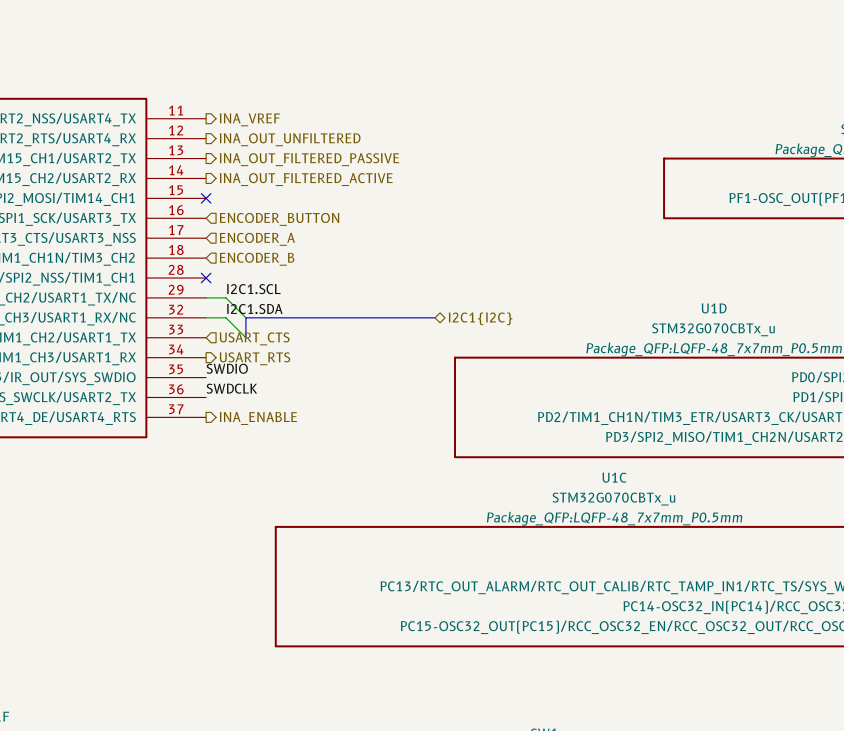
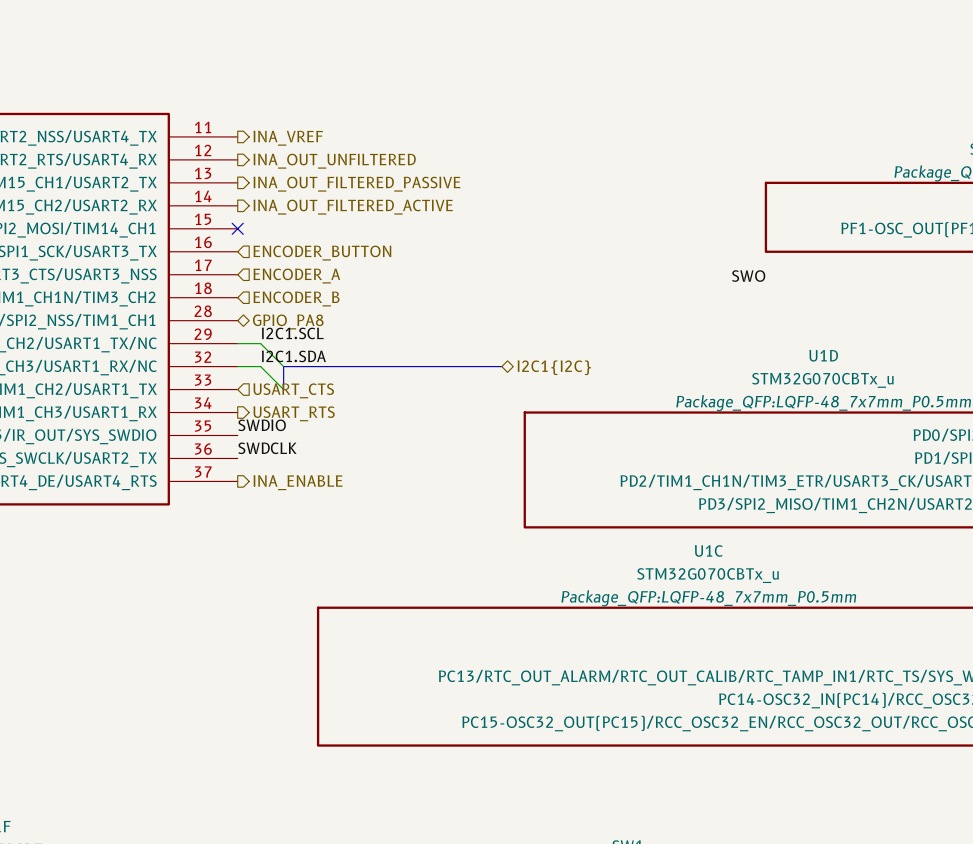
label: none -> SWO (748, 276)
no-connect mark: (206, 278) -> none
hierarchical label: none -> GPIO_PA8 (288, 321)

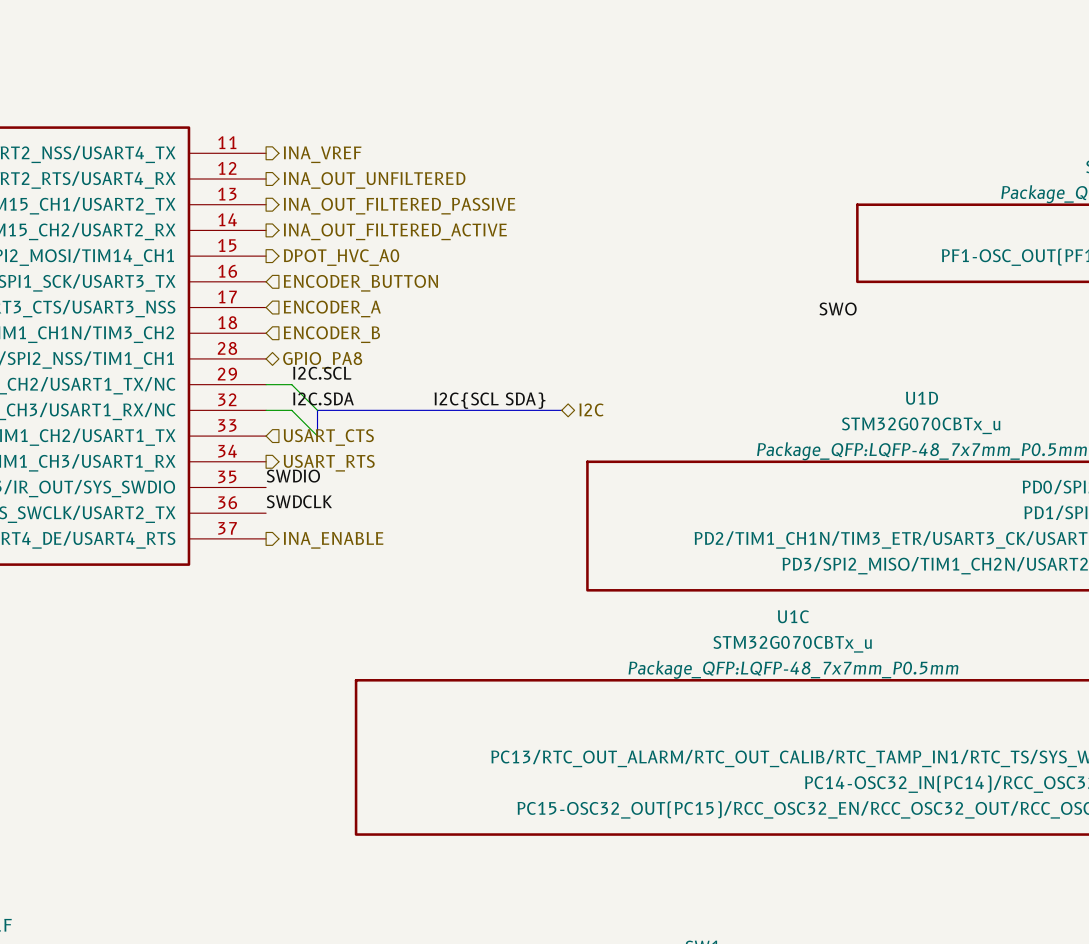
no-connect mark: (237, 228) -> none
hierarchical label: none -> DPOT_HVC_A0 (341, 257)
label: I2C1.SCL (292, 333) -> I2C.SCL (322, 373)
label: I2C1.SDA (293, 356) -> I2C.SDA (323, 398)
label: none -> I2C{SCL SDA} (489, 400)
hierarchical label: I2C1{I2C} (554, 367) -> I2C (591, 409)

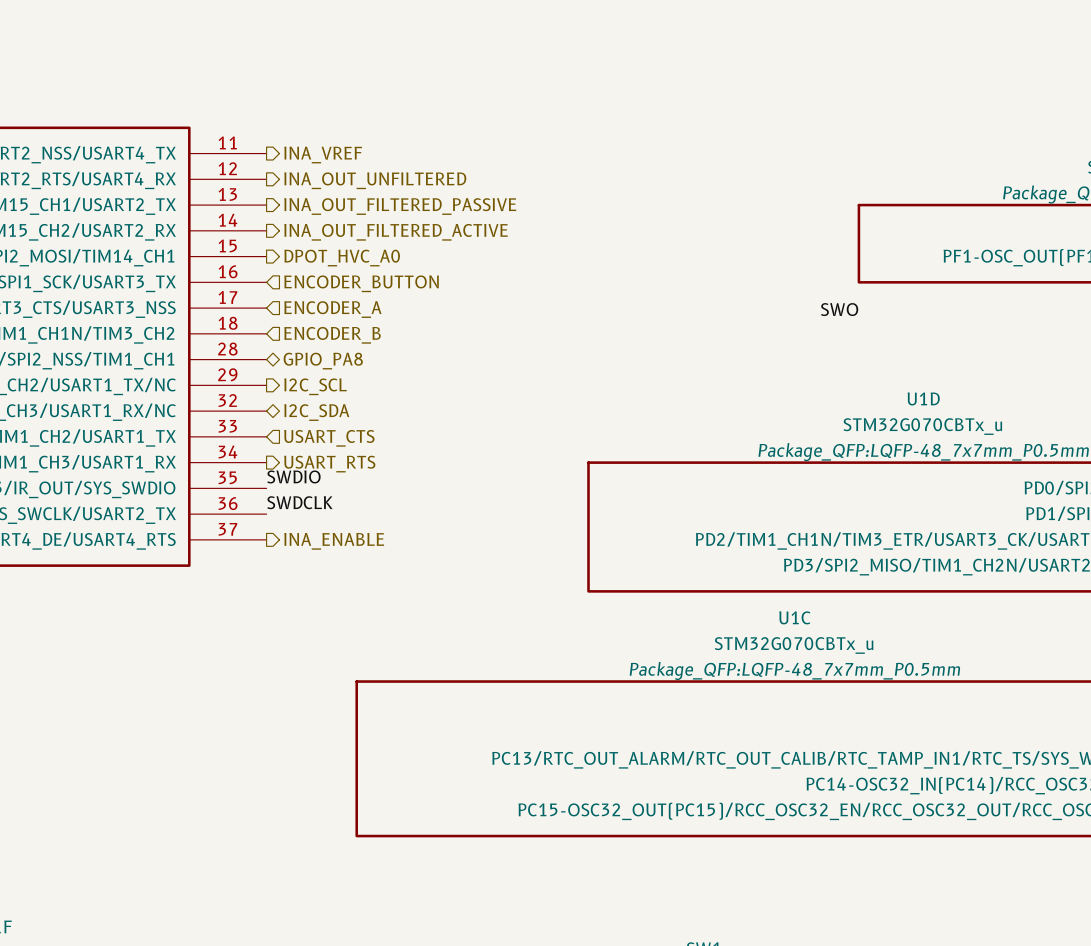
label: I2C.SCL (322, 373) -> none
wire: (266, 384) (291, 384) (317, 410) -> none
hierarchical label: none -> I2C_SCL (315, 386)
label: I2C.SDA (323, 398) -> none
label: I2C{SCL SDA} (489, 400) -> none
hierarchical label: I2C (591, 409) -> none
wire: (266, 410) (291, 410) (317, 436) -> none
bus: (561, 410) (317, 410) (317, 436) -> none
hierarchical label: none -> I2C_SDA (316, 412)

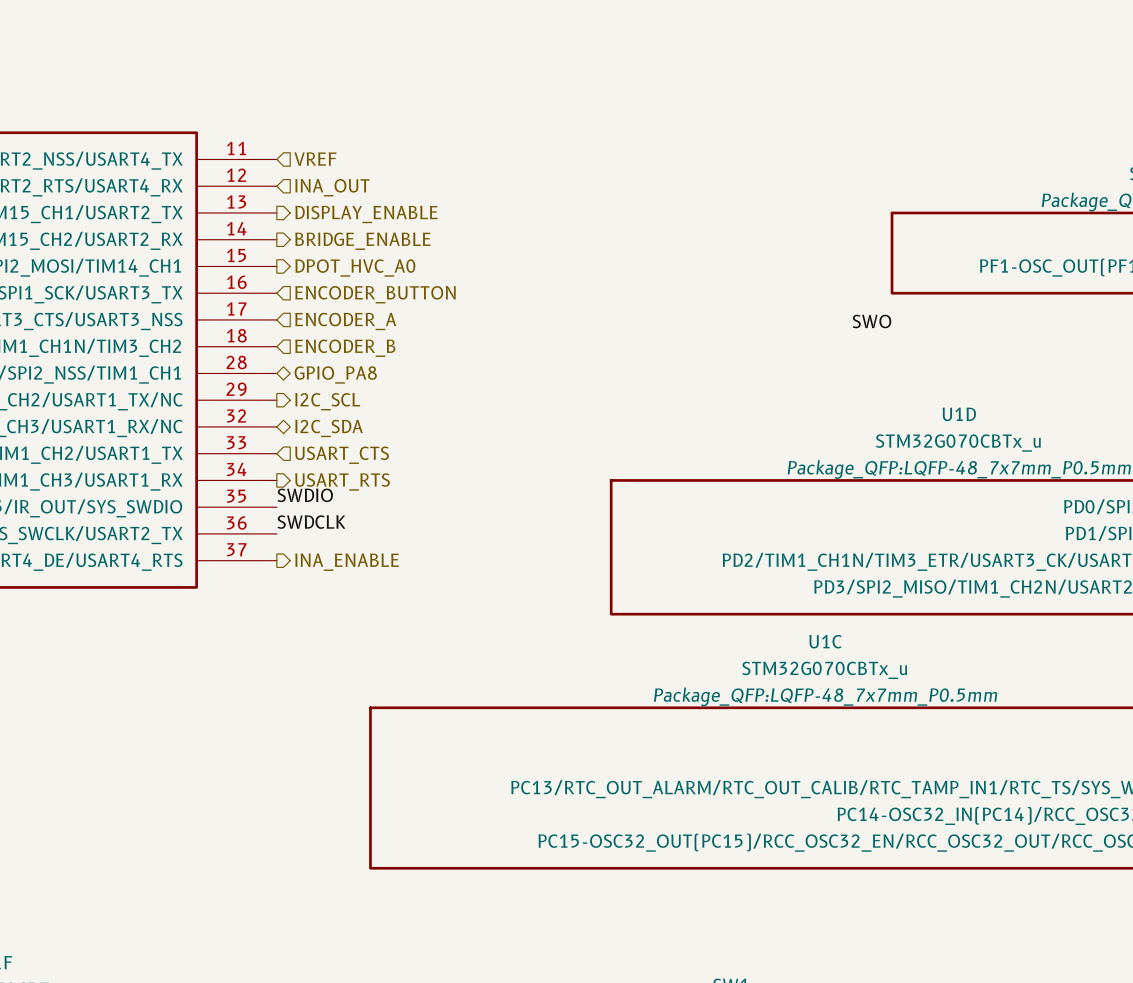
hierarchical label shape: output (323, 155) -> input (315, 159)
hierarchical label: INA_VREF (323, 155) -> VREF (315, 159)
hierarchical label shape: output (375, 180) -> input (332, 187)
hierarchical label: INA_OUT_UNFILTERED (375, 180) -> INA_OUT (332, 187)
hierarchical label: INA_OUT_FILTERED_PASSIVE (400, 206) -> DISPLAY_ENABLE (366, 214)
hierarchical label: INA_OUT_FILTERED_ACTIVE (396, 232) -> BRIDGE_ENABLE (362, 241)

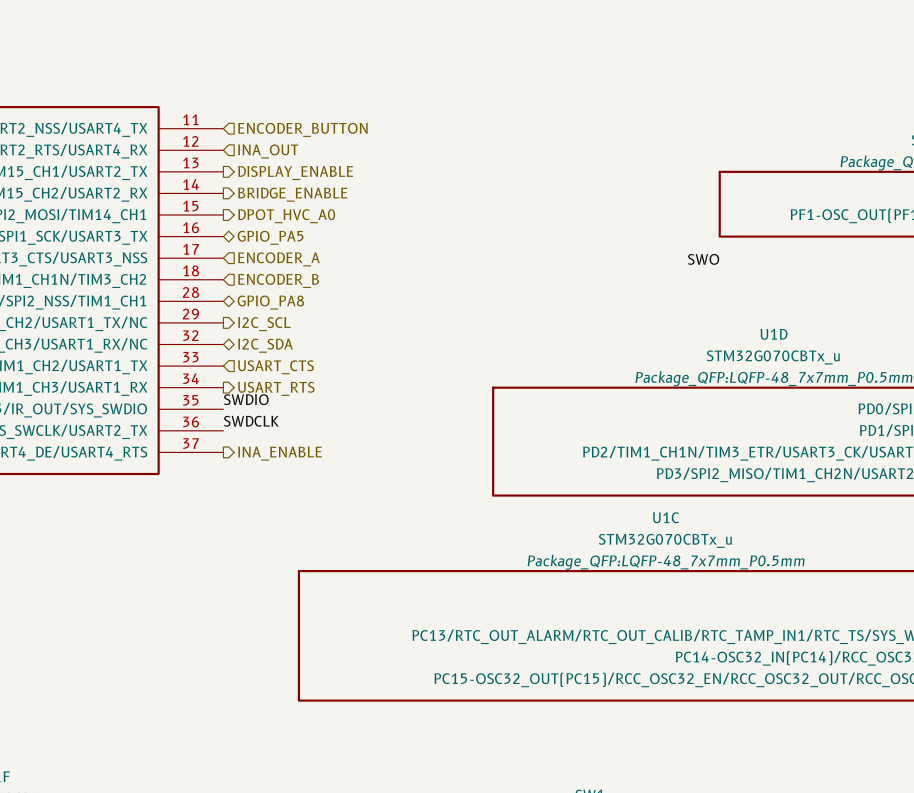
hierarchical label: VREF (315, 159) -> ENCODER_BUTTON (302, 129)
hierarchical label shape: input (375, 294) -> bidirectional (270, 237)
hierarchical label: ENCODER_BUTTON (375, 294) -> GPIO_PA5 (270, 237)

